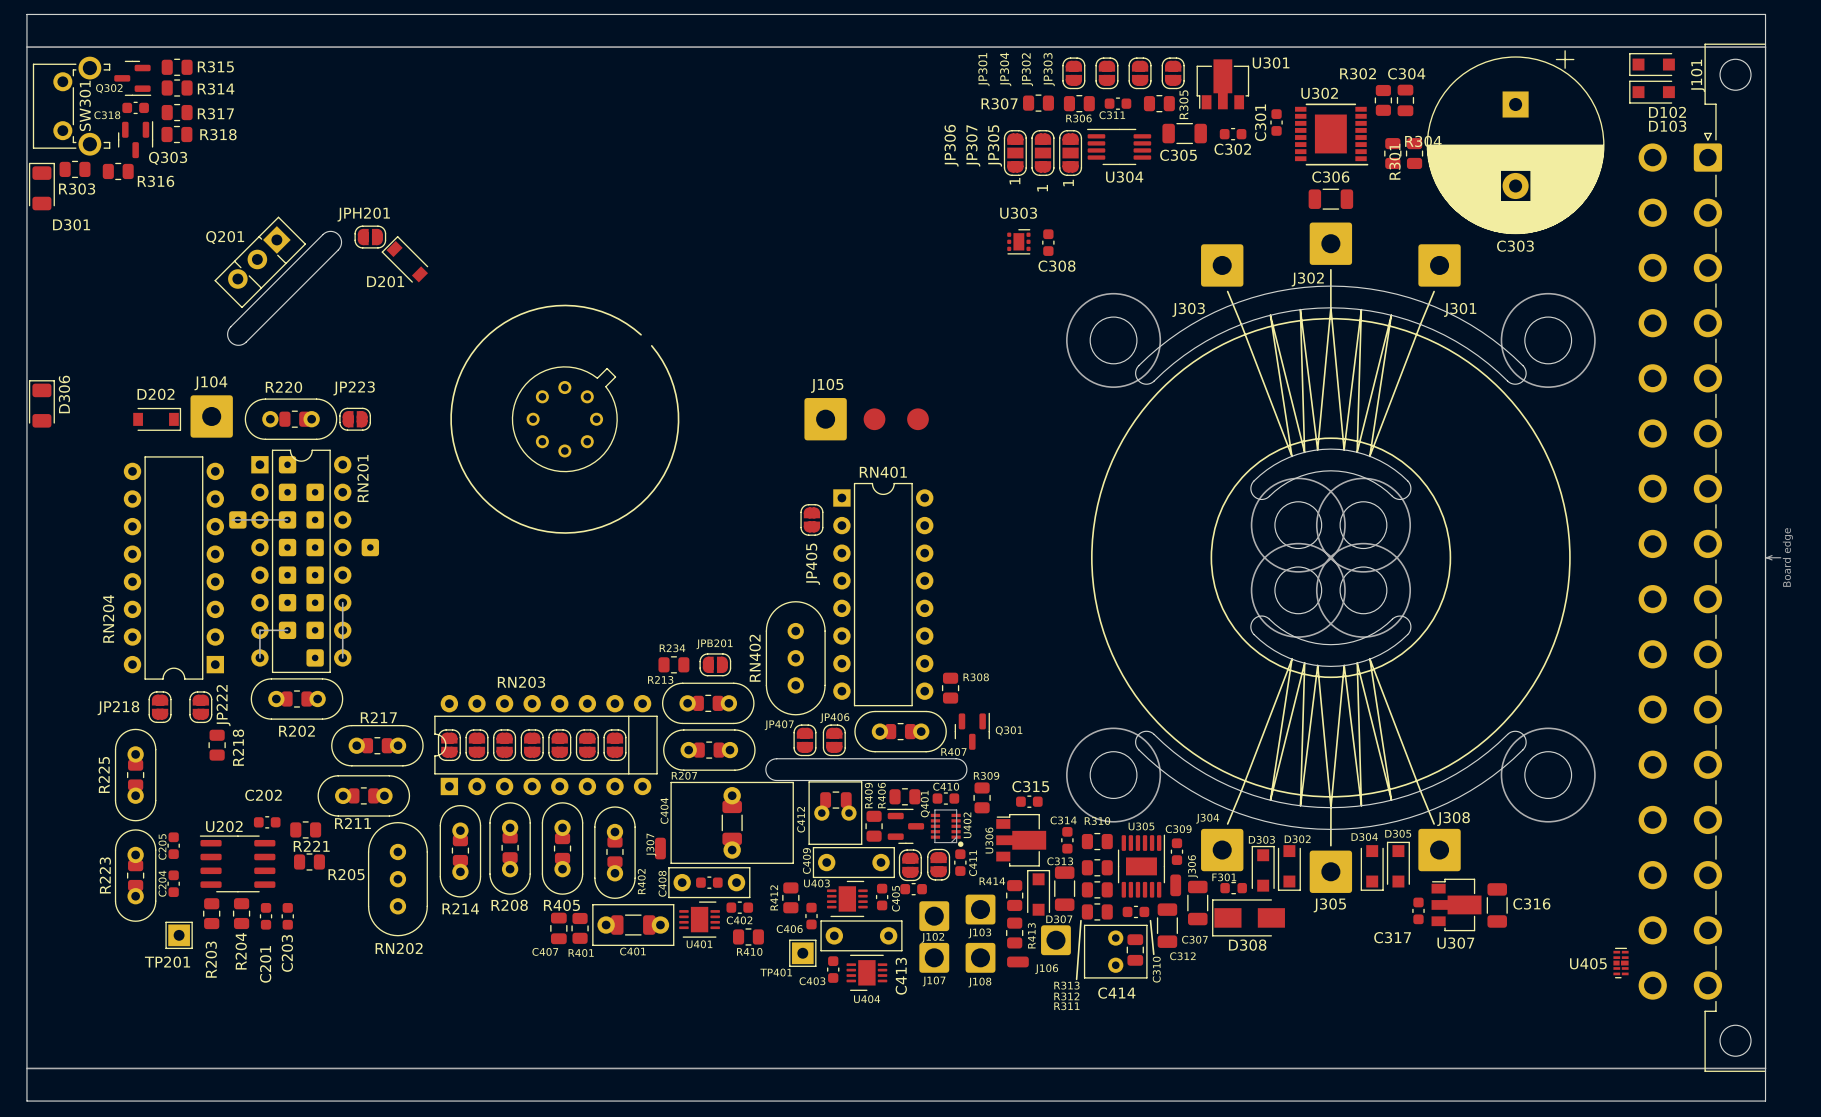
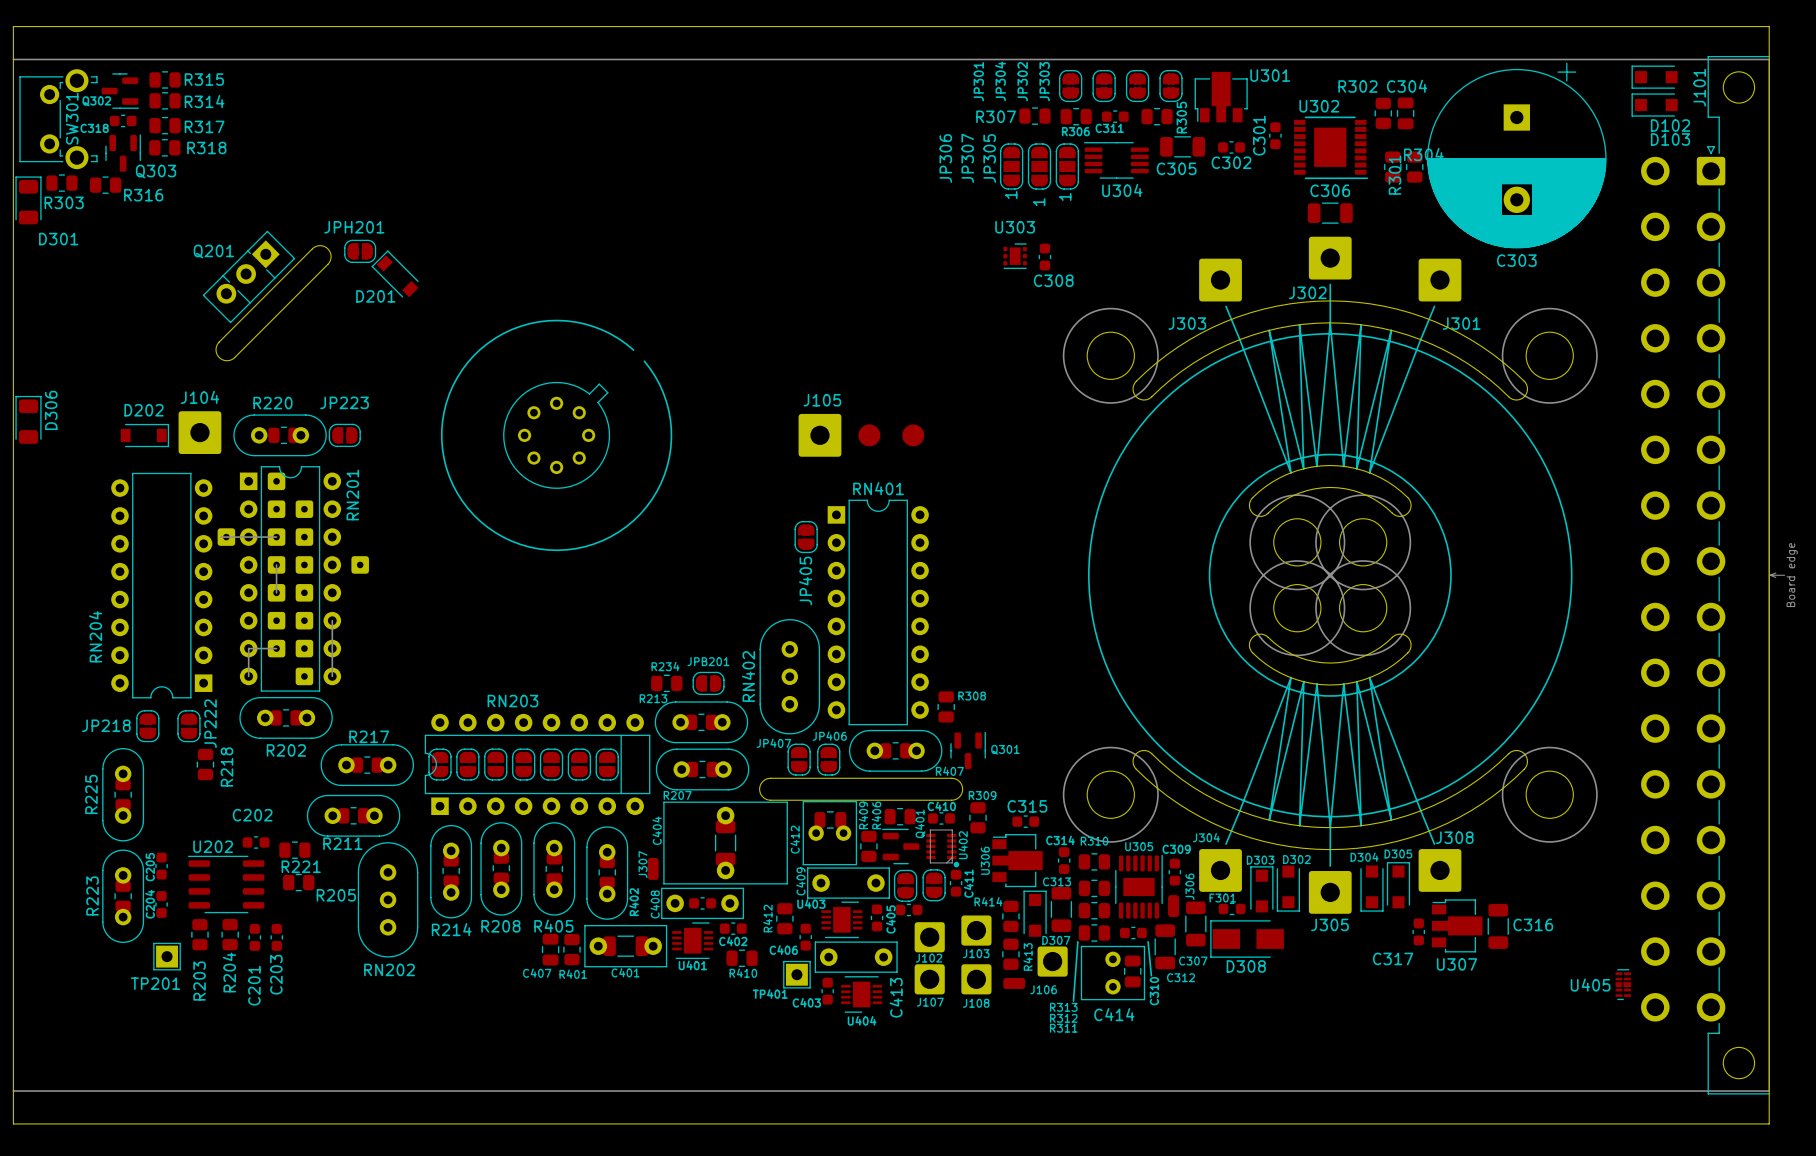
line: none -> (276, 564) (276, 592)

